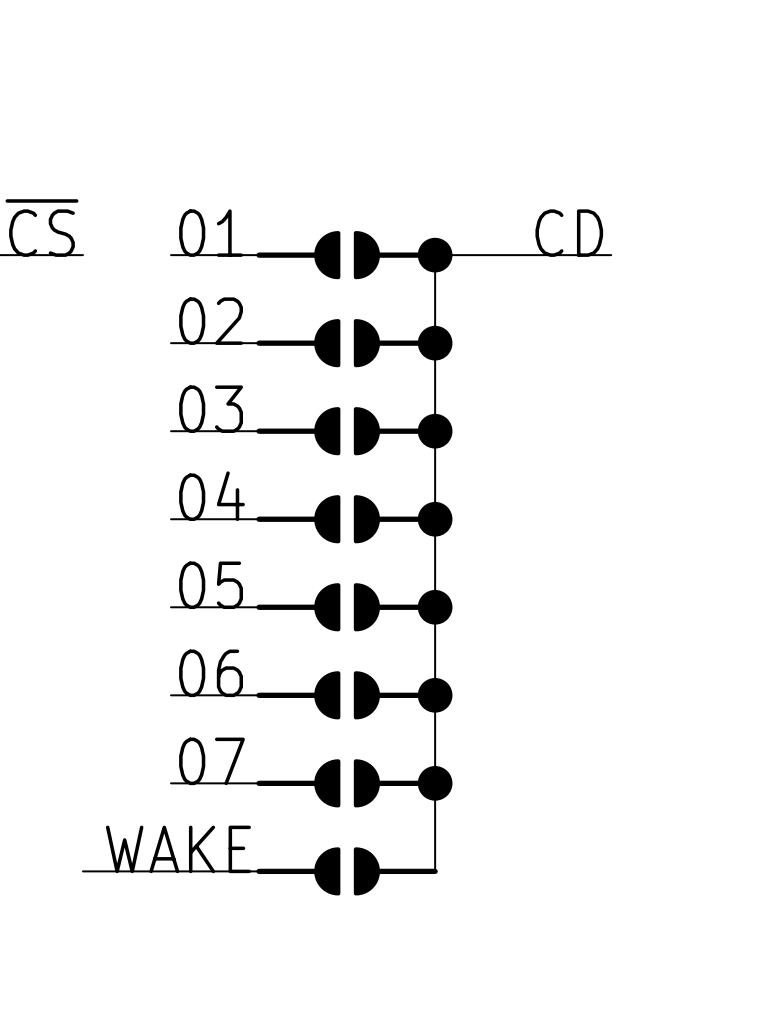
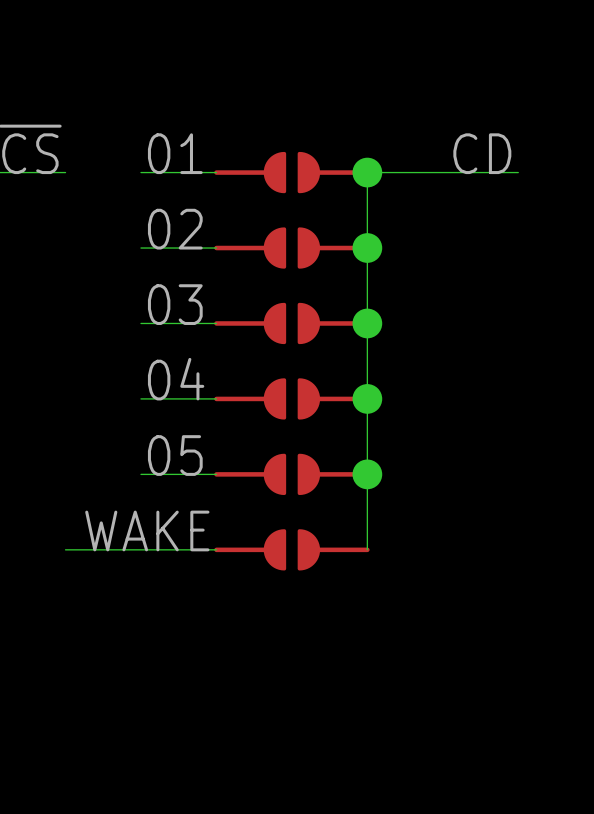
label: 06 (211, 673) -> none
wire: (435, 695) (435, 871) -> none
junction: (435, 695) -> none
label: 07 (212, 761) -> none
wire: (171, 783) (259, 783) -> (65, 549) (140, 549)
part: (347, 783) -> none
junction: (435, 783) -> none
label position: WAKE (178, 849) -> WAKE (147, 530)
wire: (82, 871) (259, 871) -> none
part: (347, 871) -> none

